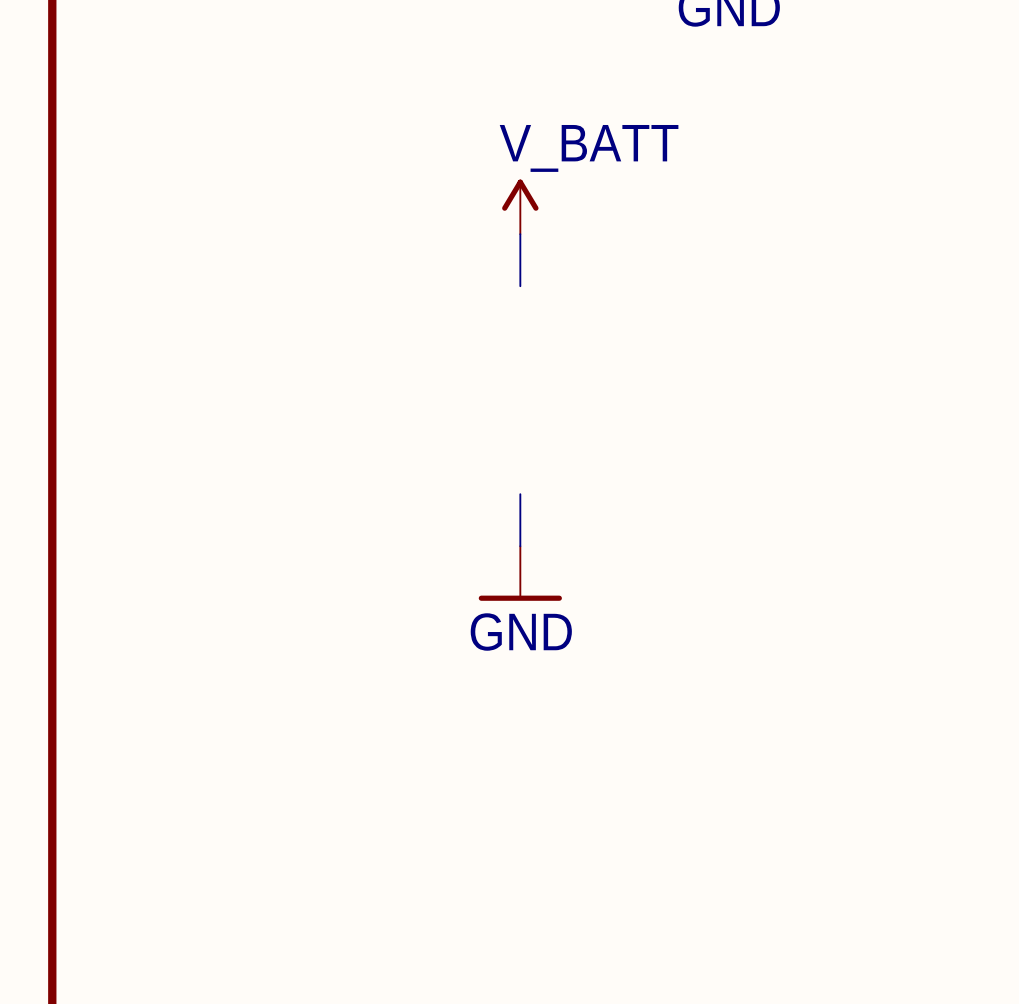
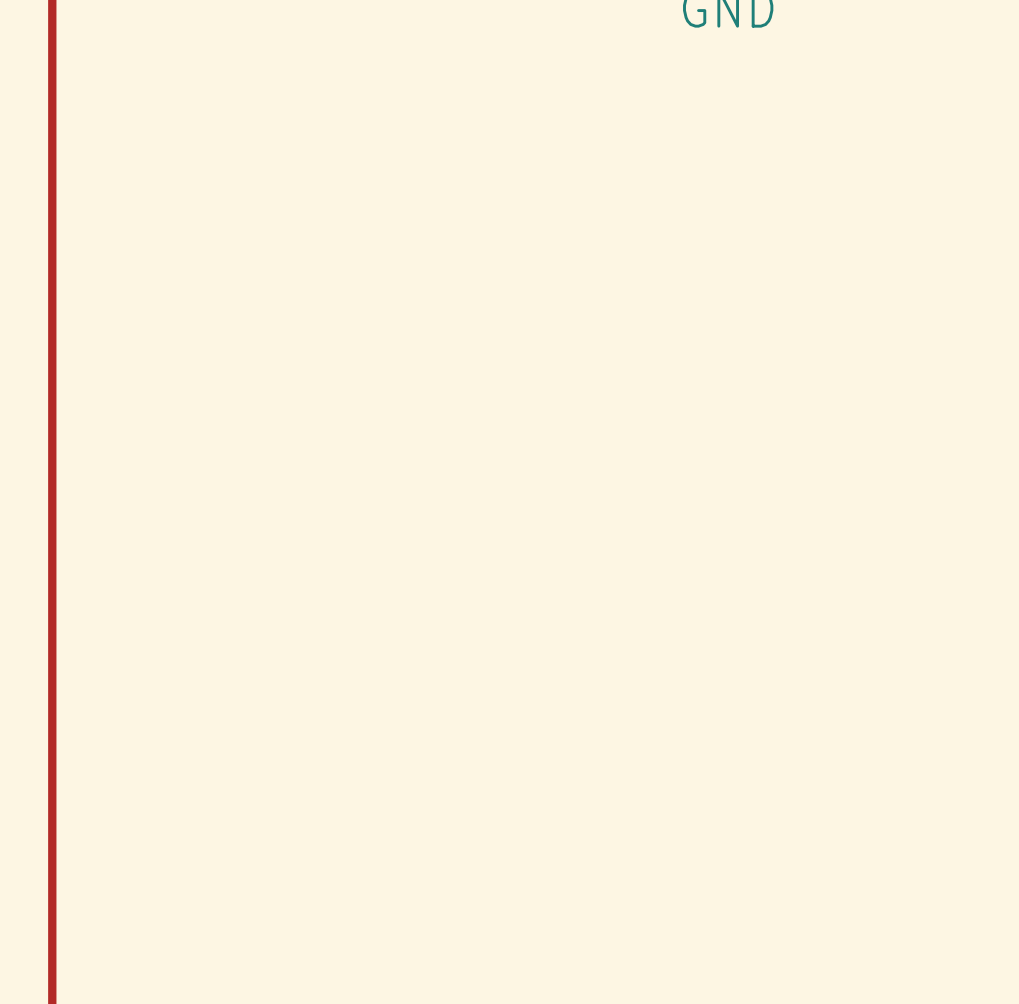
power symbol: V_BATT (520, 206) -> none
wire: (520, 234) (520, 286) -> none
wire: (520, 494) (520, 546) -> none
power symbol: GND (520, 573) -> none

